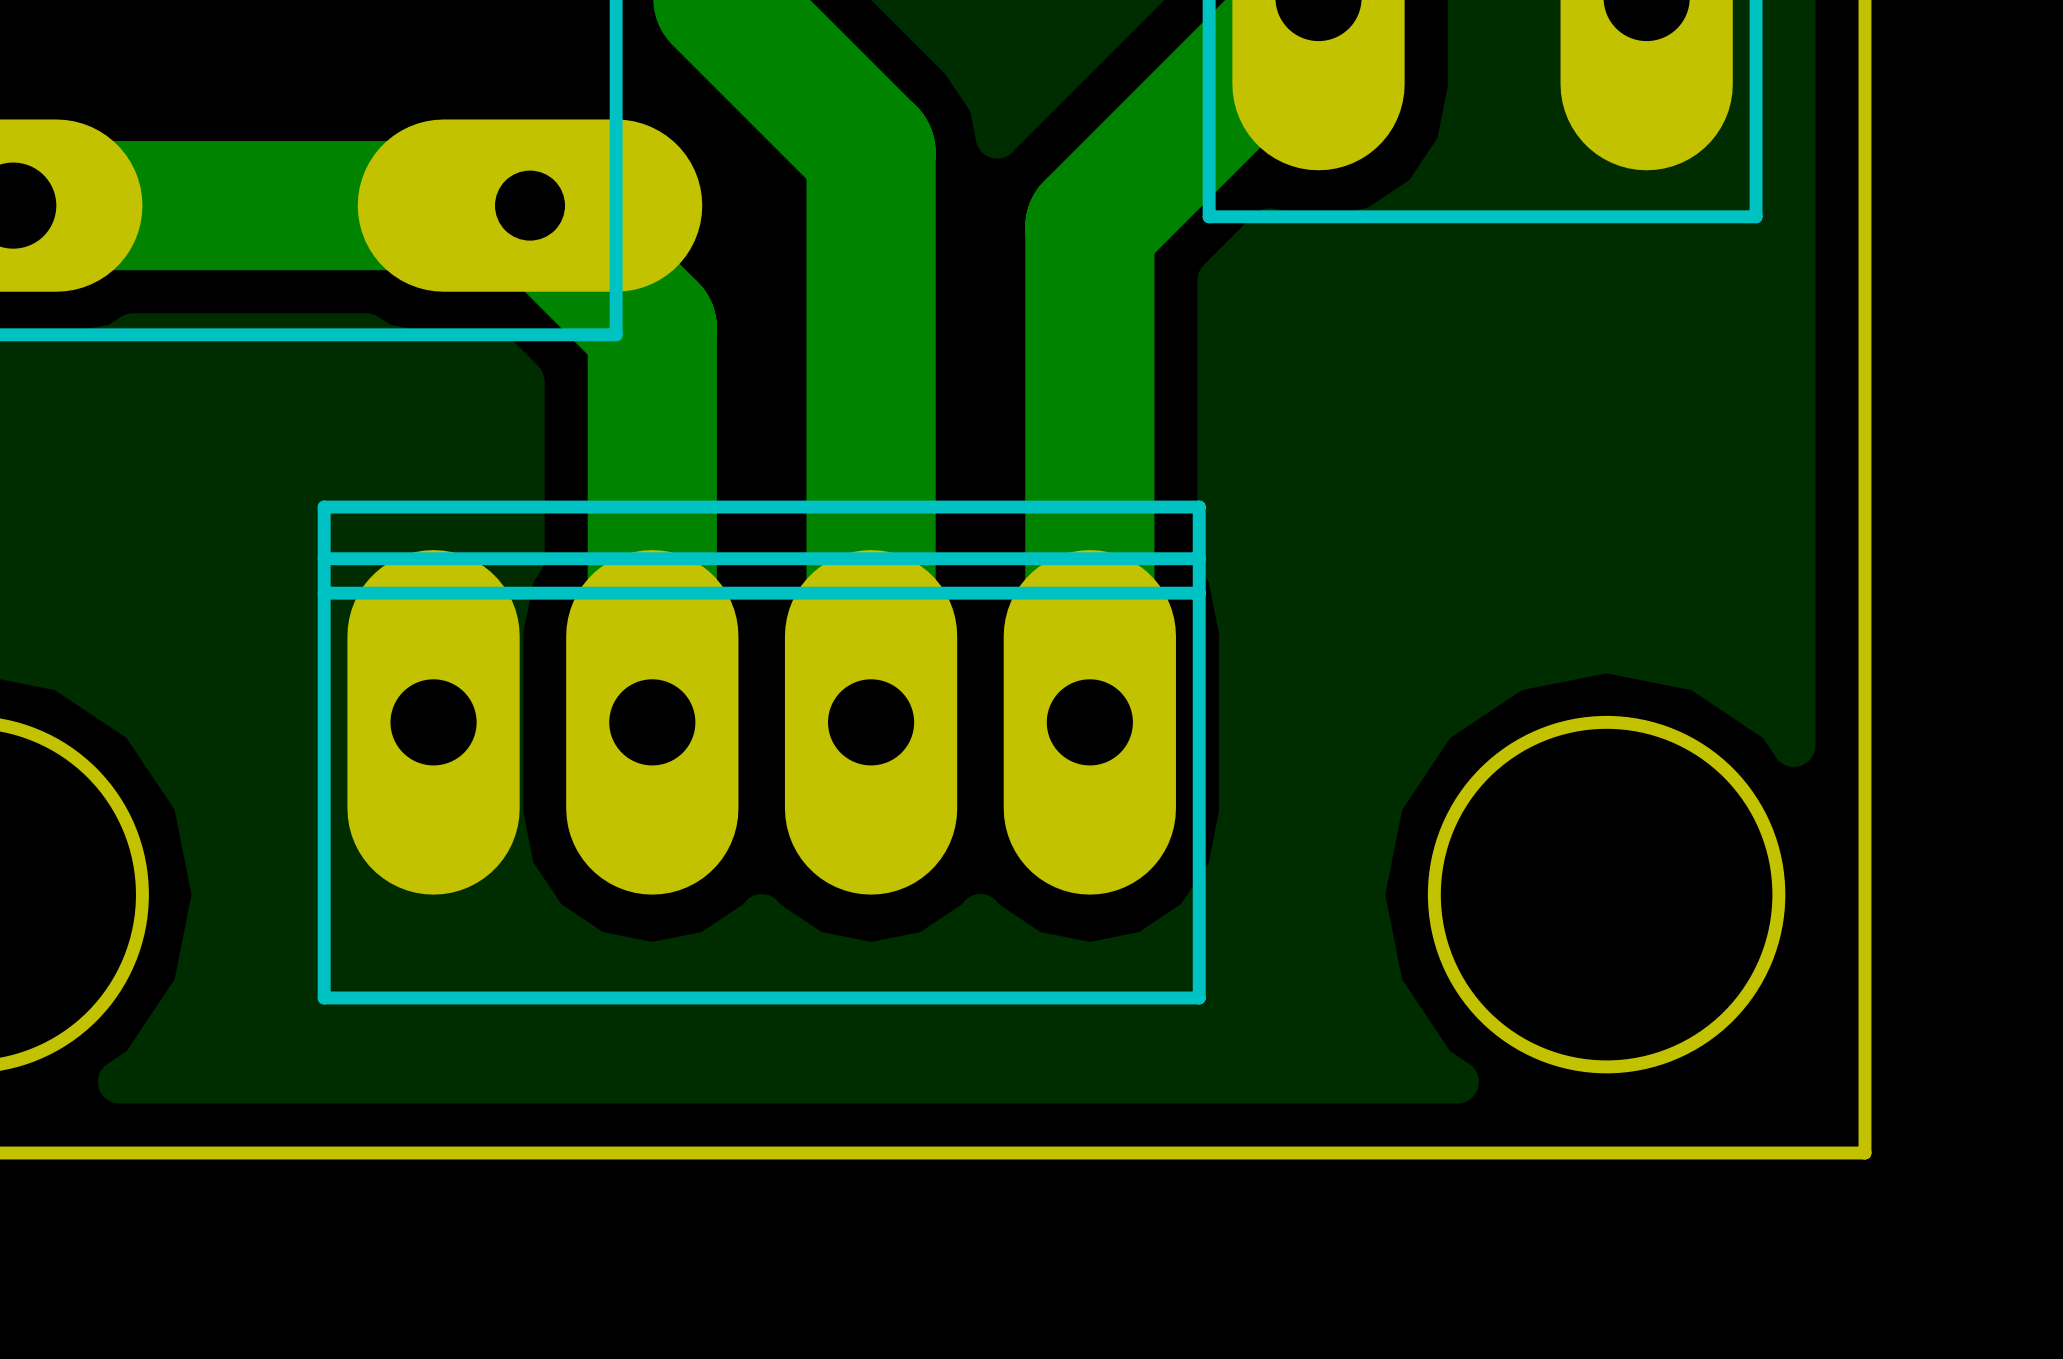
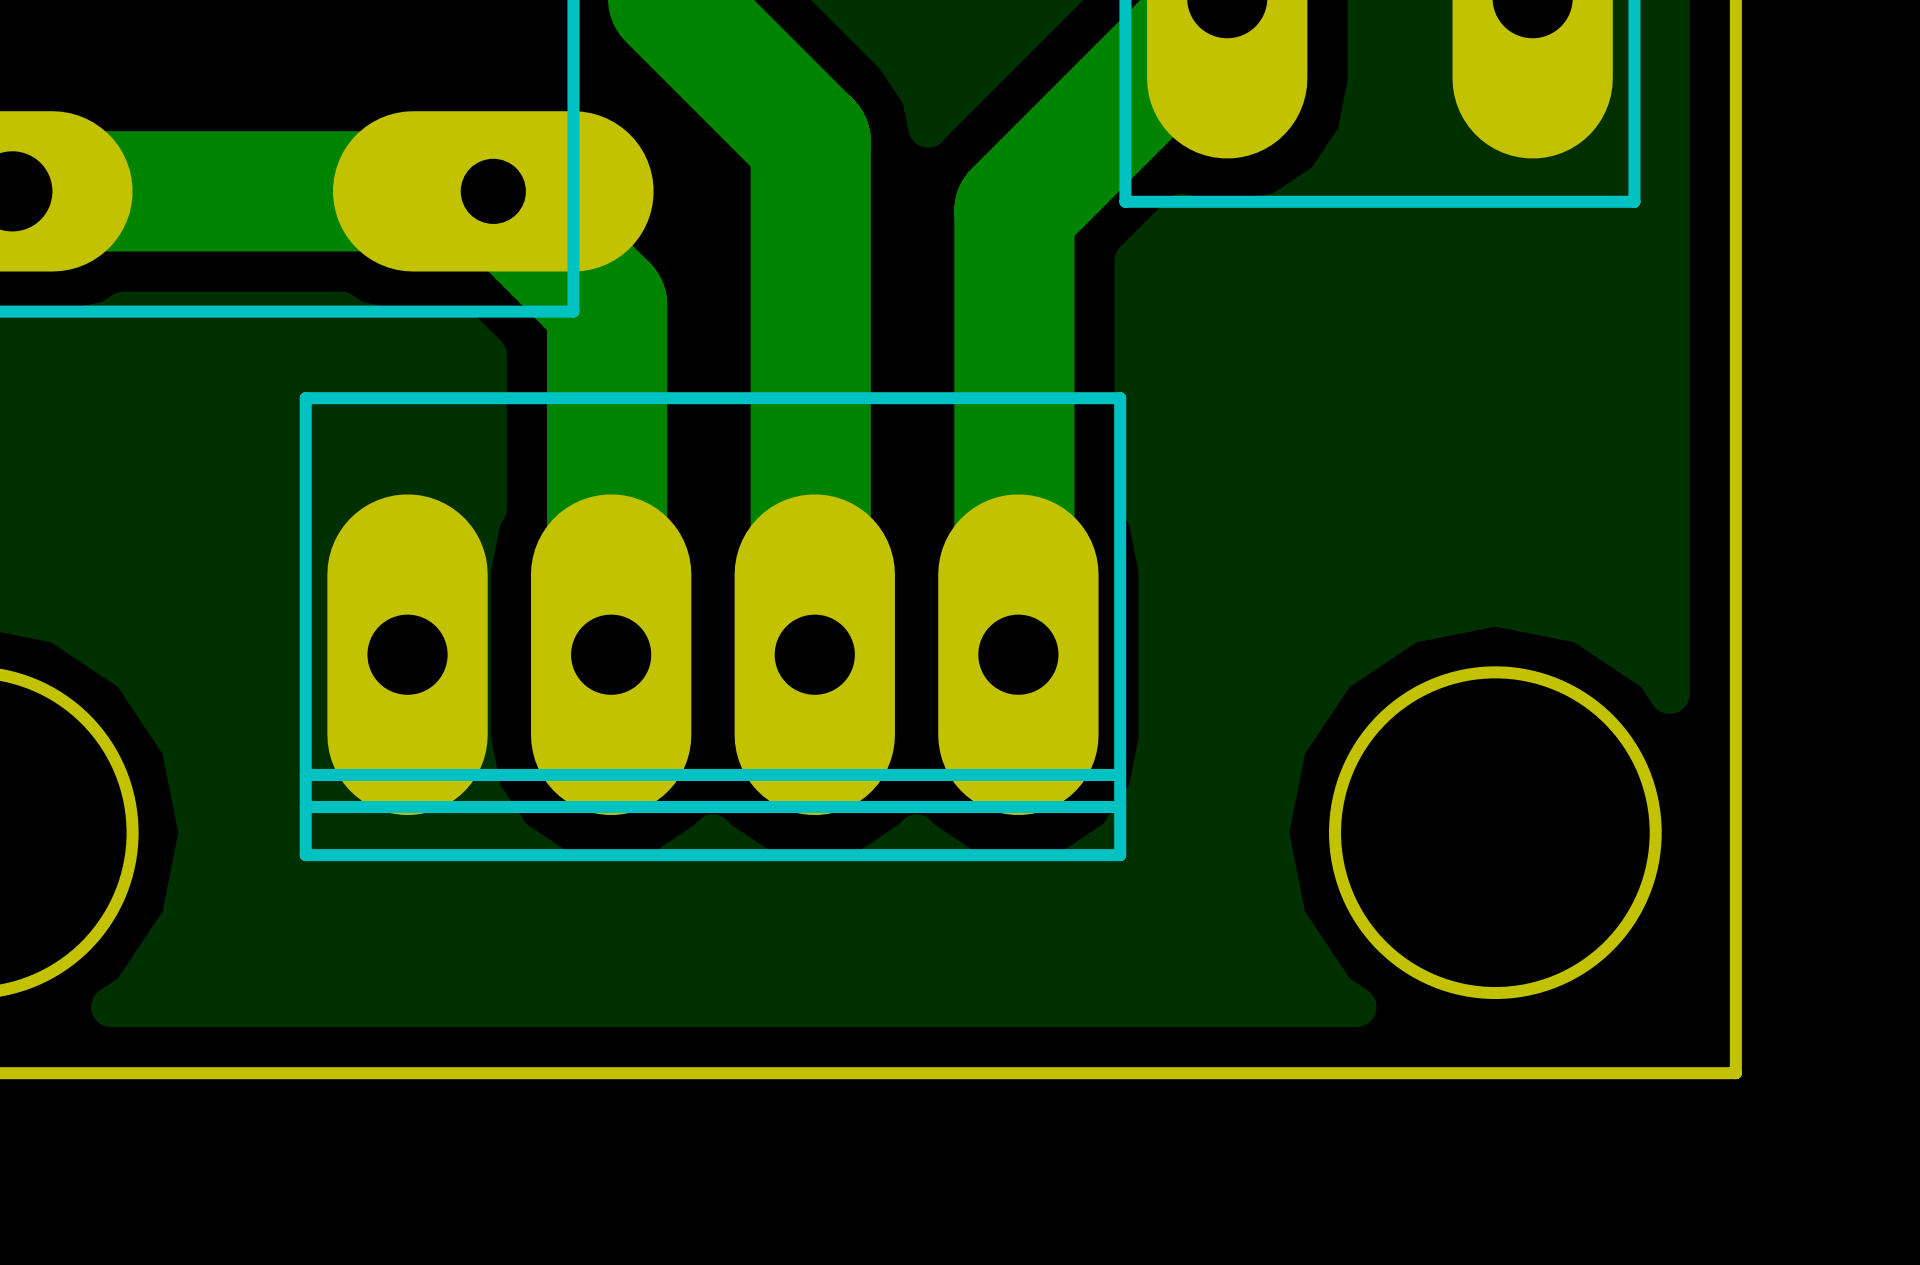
part rotation: 0° (761, 752) -> 180° (712, 626)

